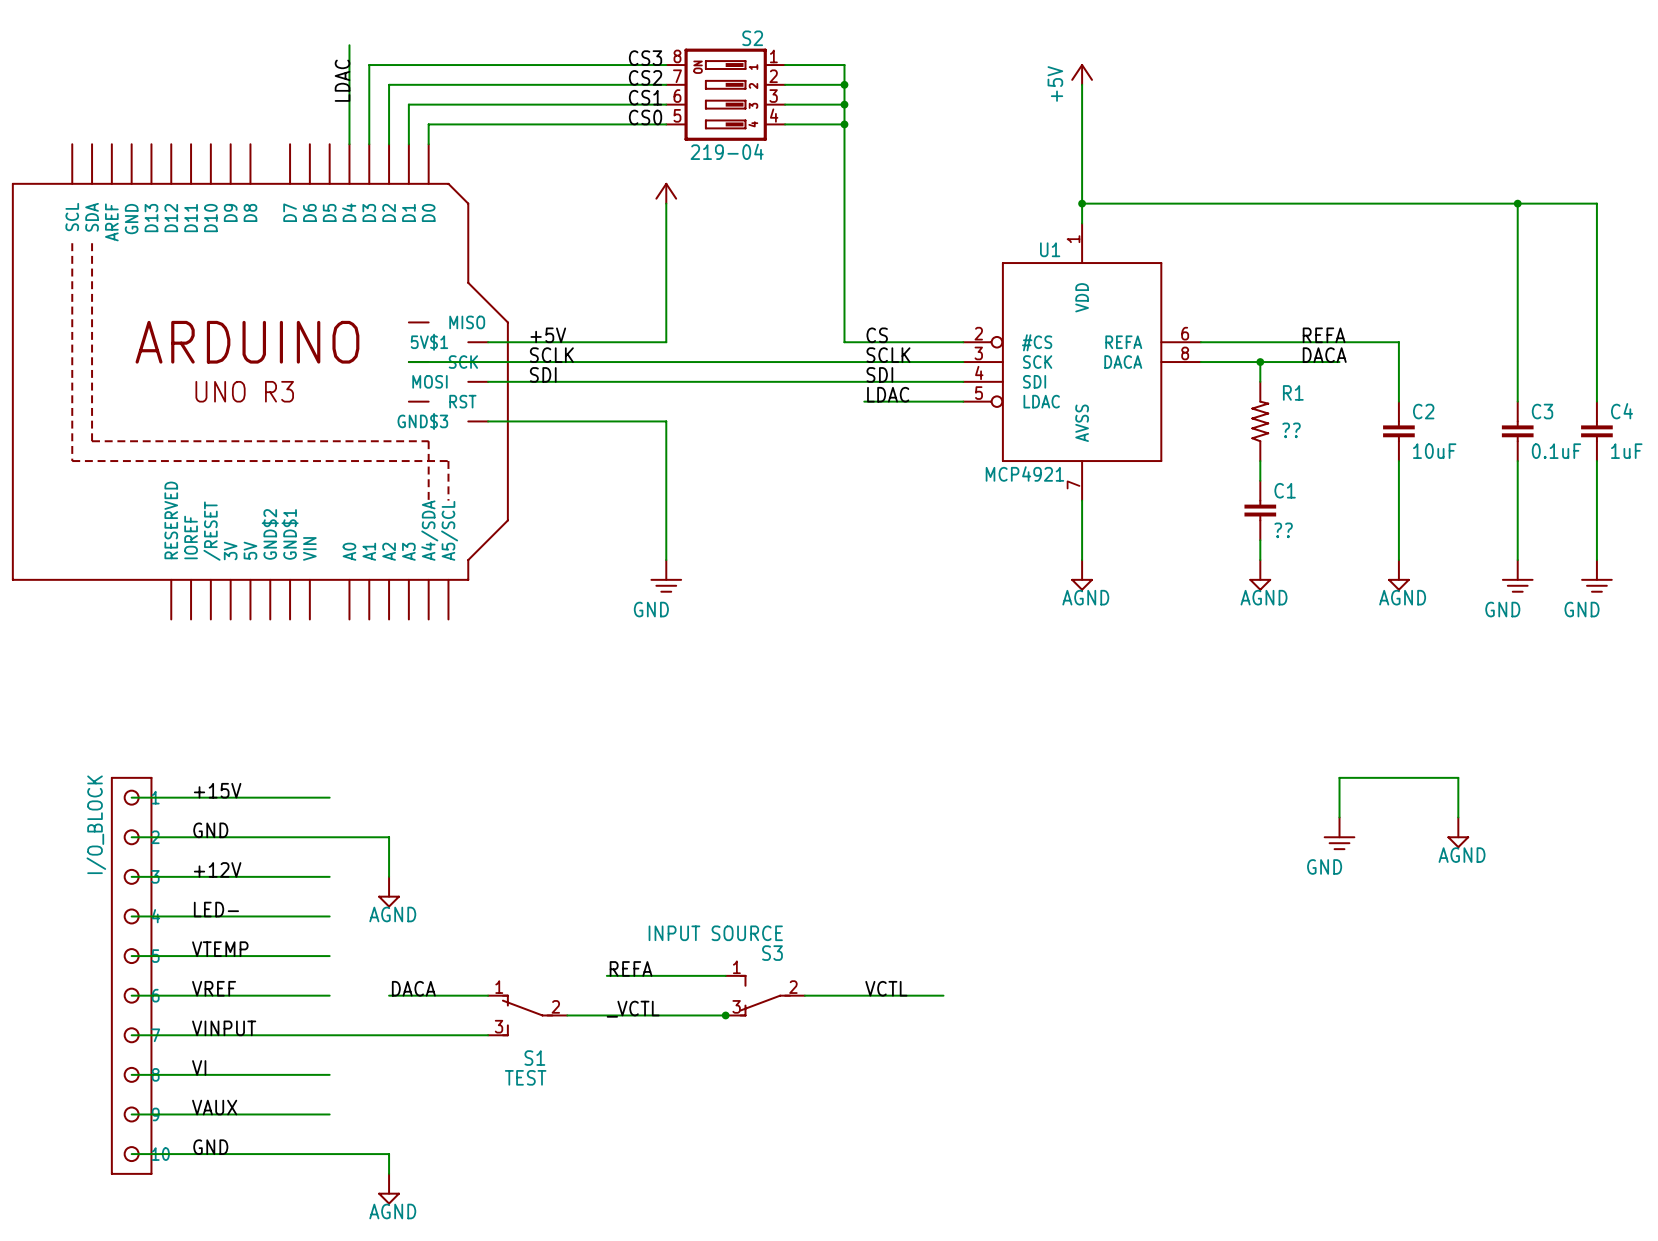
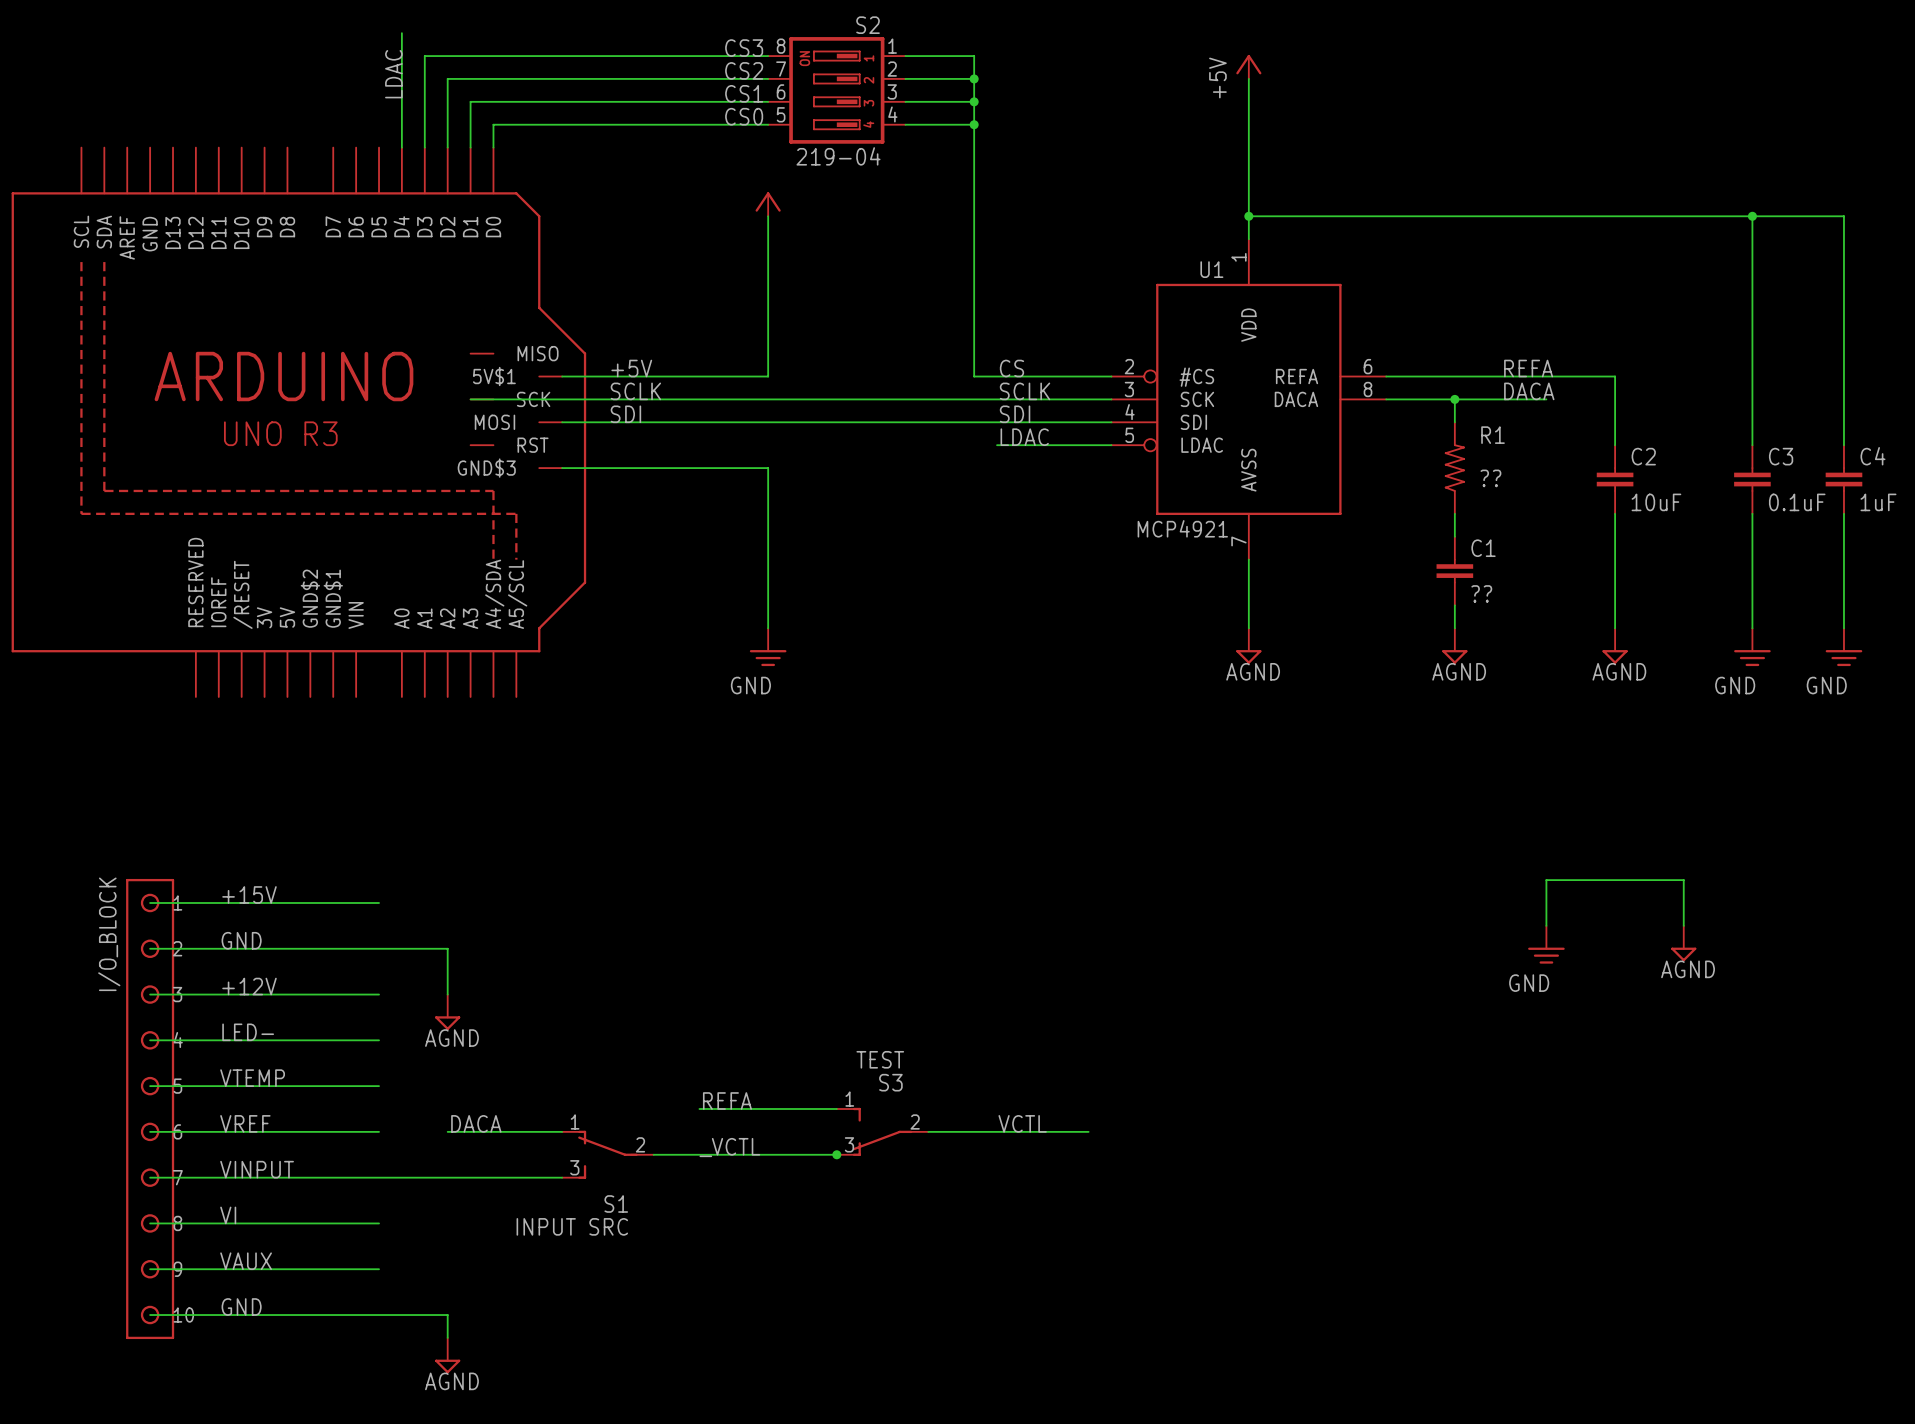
S3 value: INPUT SOURCE (715, 933) -> TEST (880, 1059)
S1 value: TEST (525, 1077) -> INPUT SRC (572, 1226)

